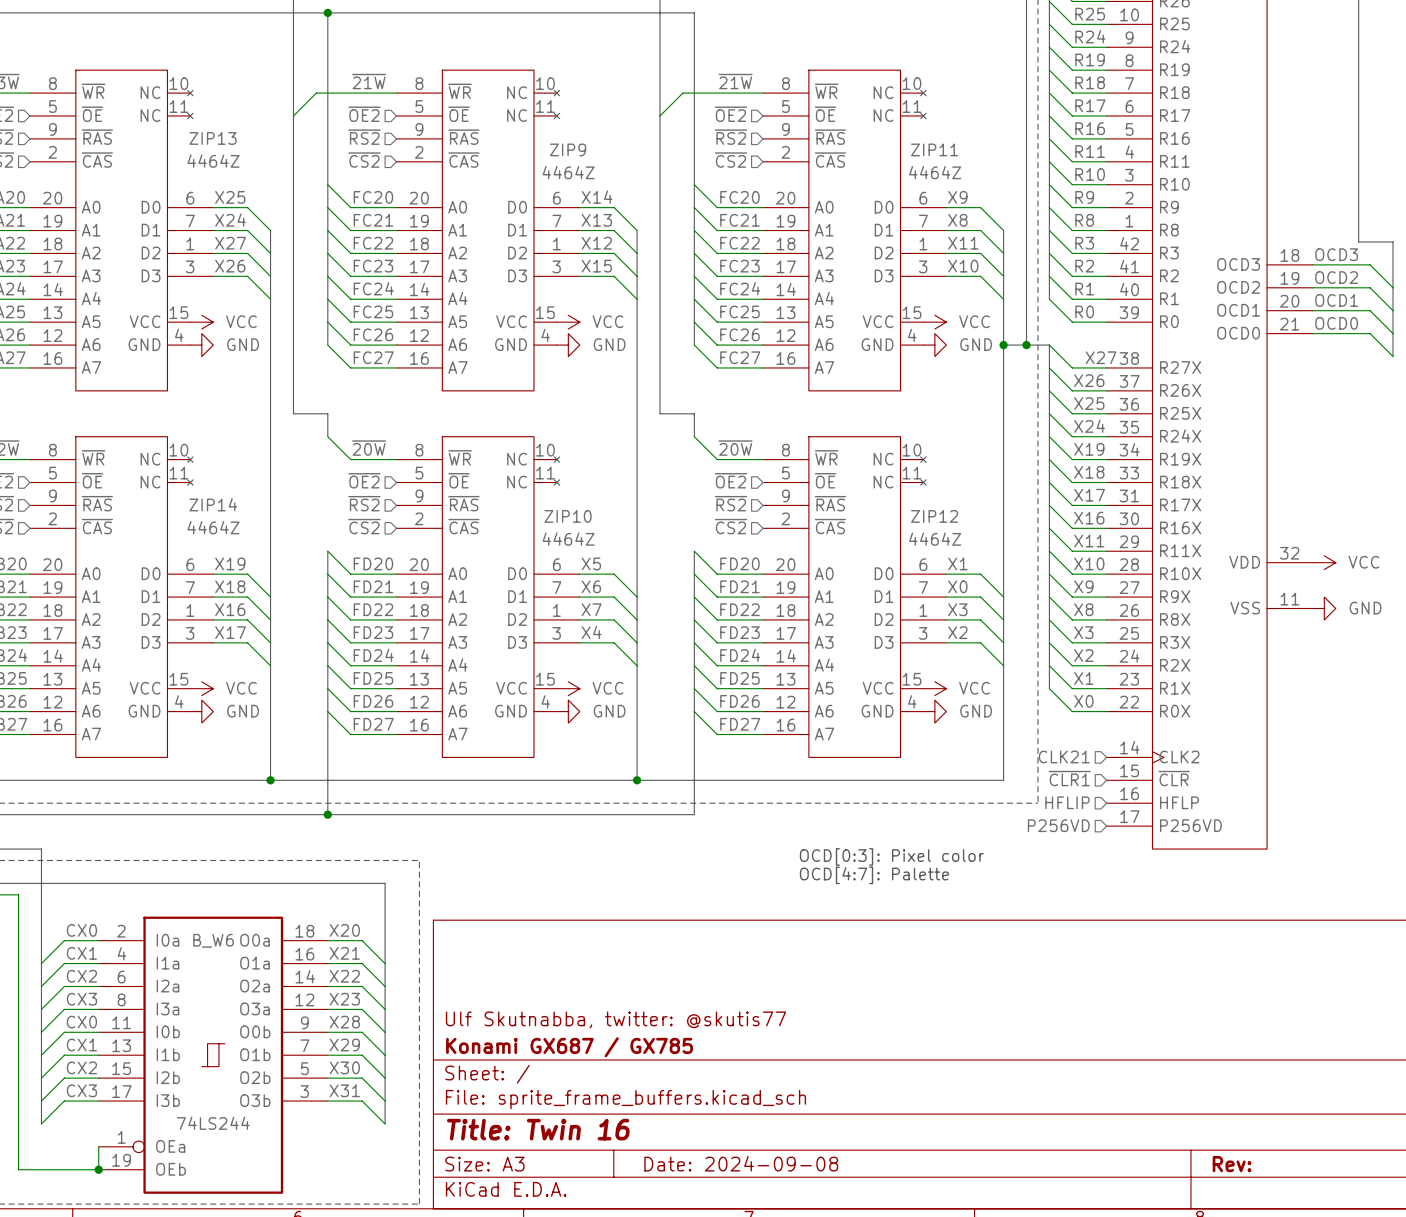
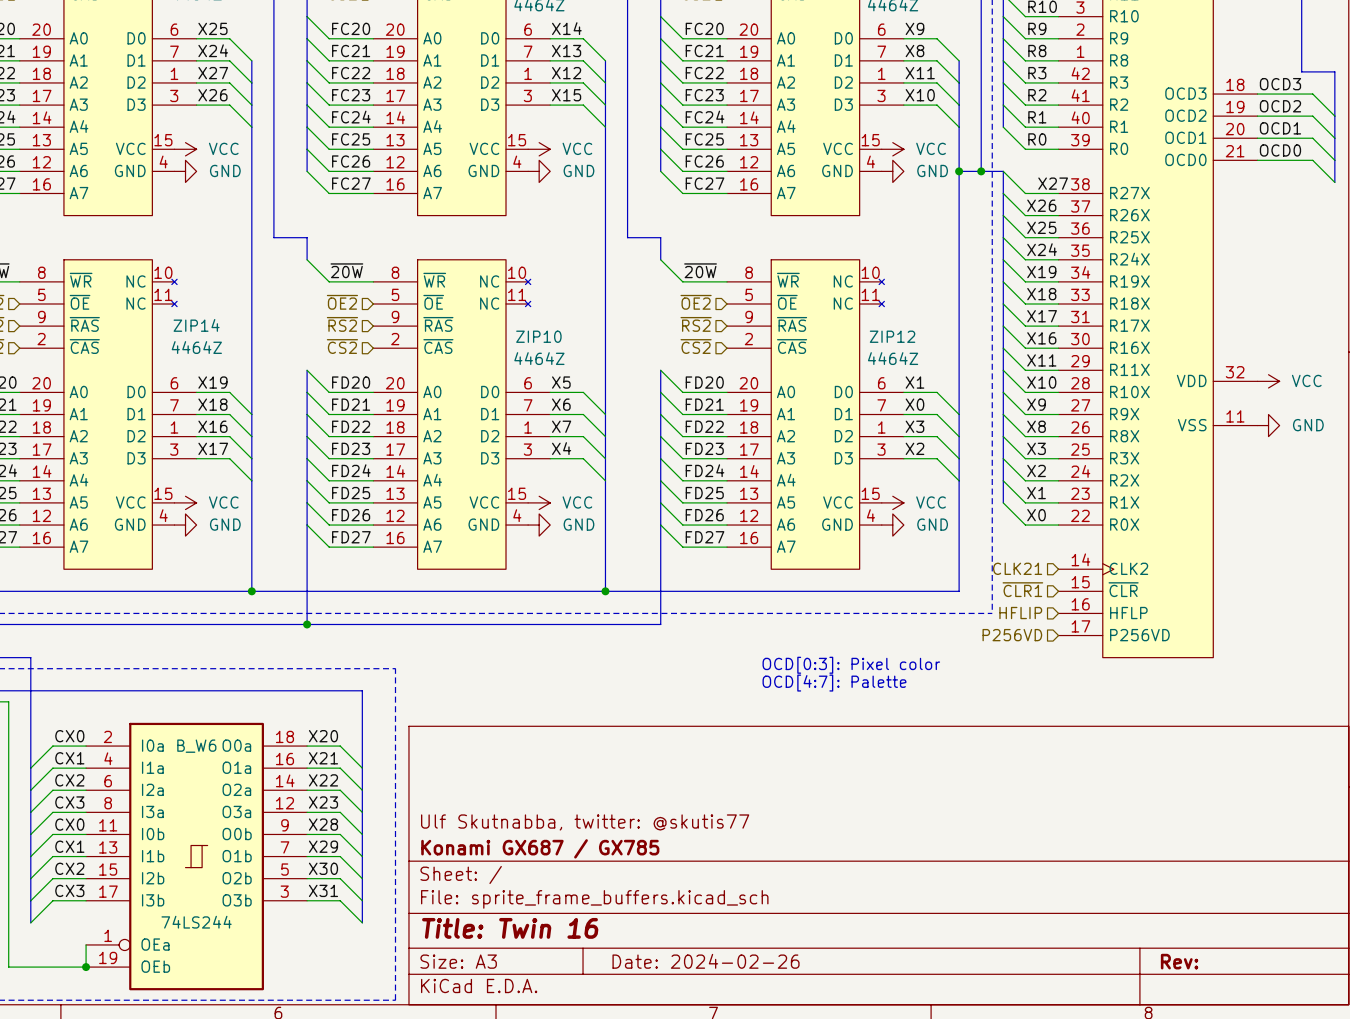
title block: Date: 2024-09-08 (741, 1163) -> Date: 2024-02-26 (706, 961)

